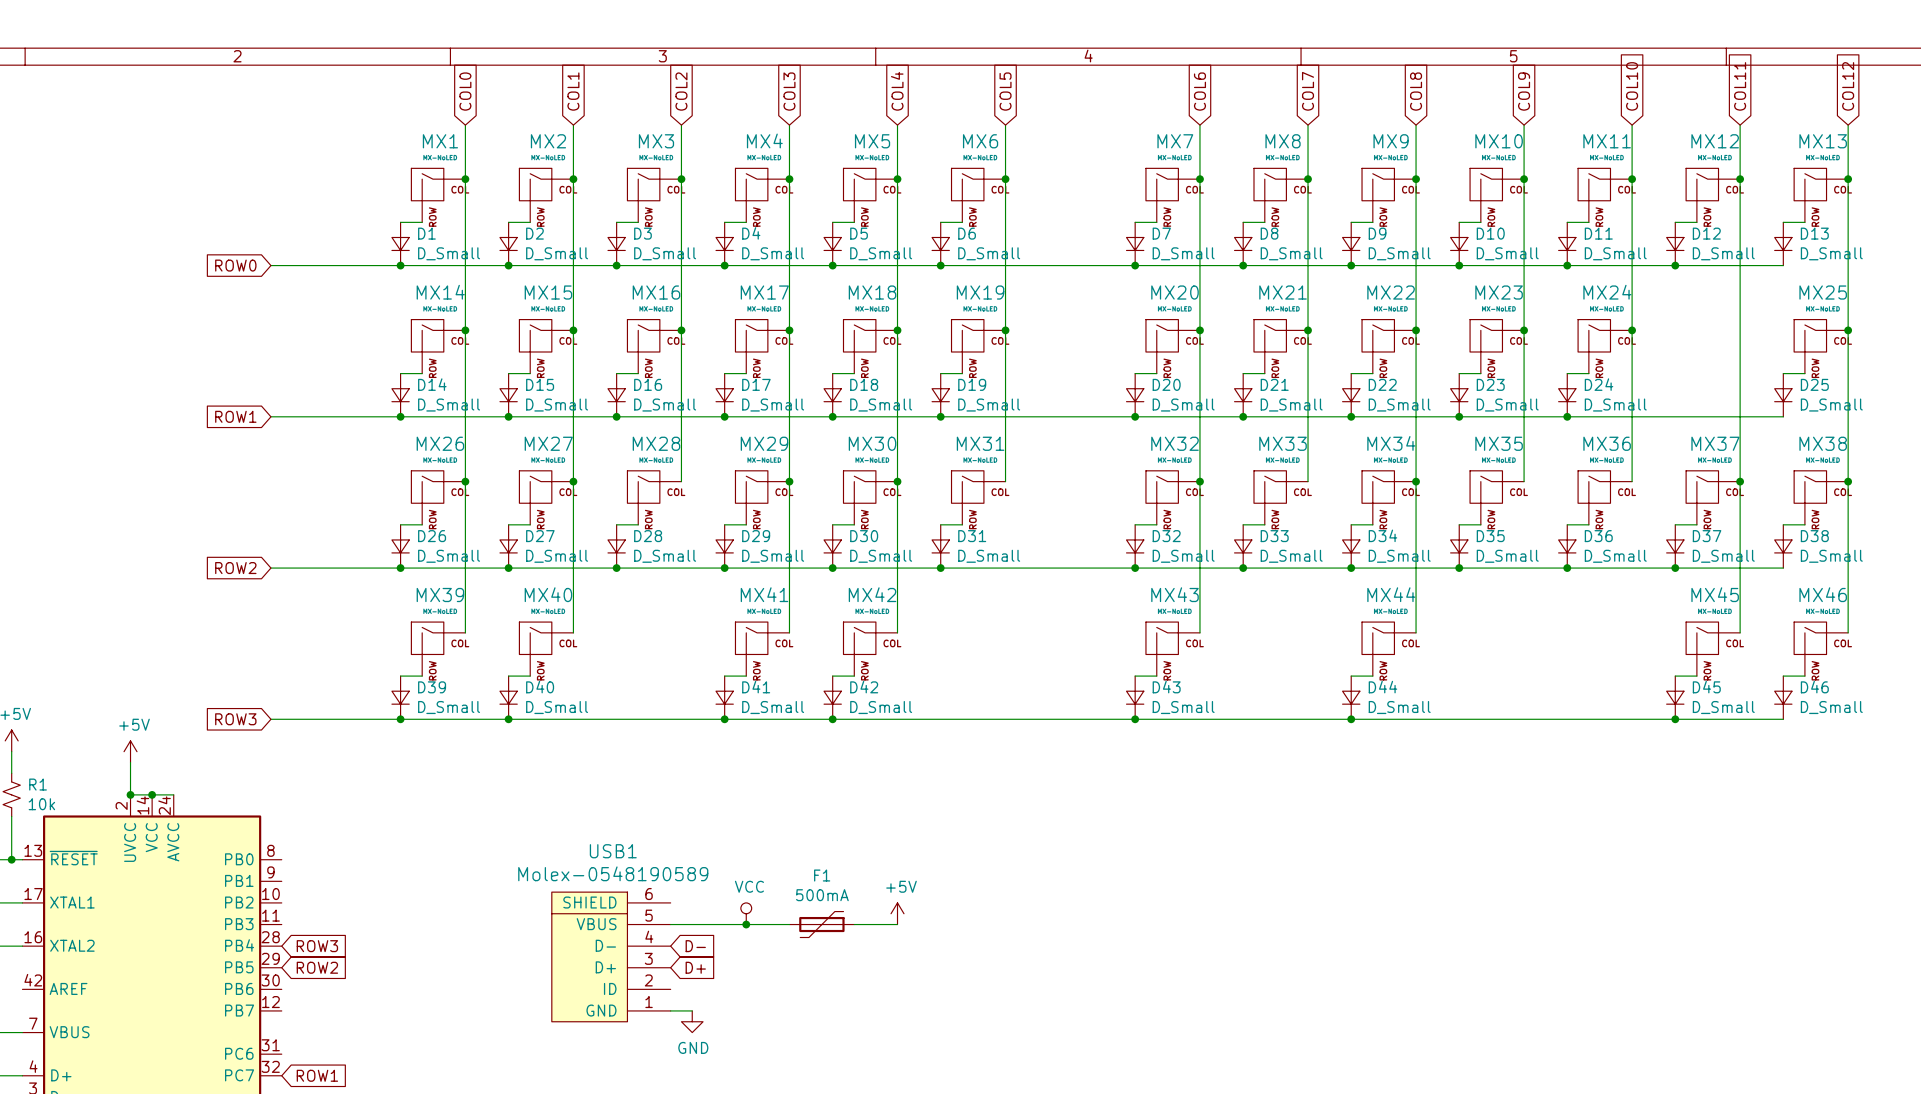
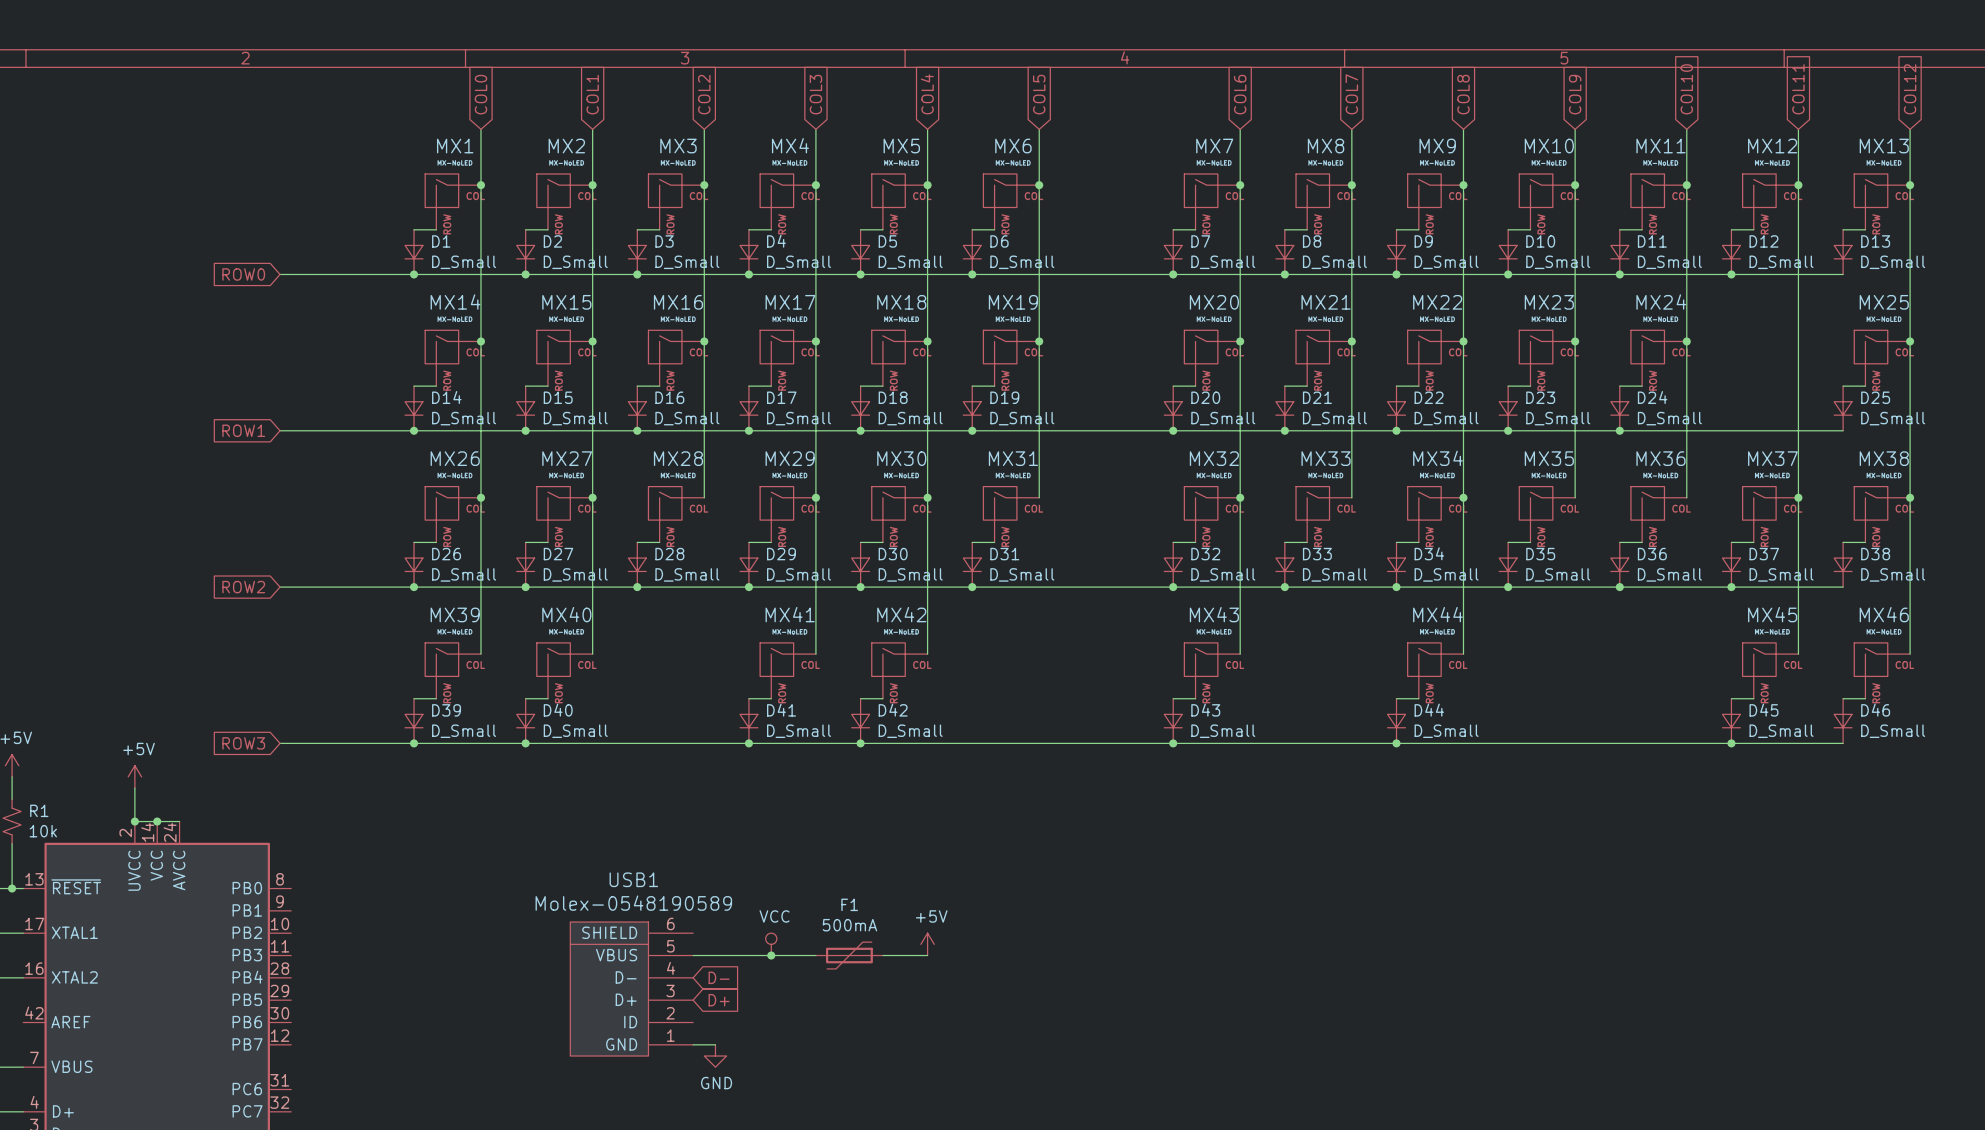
global label: ROW3 (317, 946) -> none
global label: ROW2 (317, 967) -> none
global label: ROW1 (317, 1075) -> none

